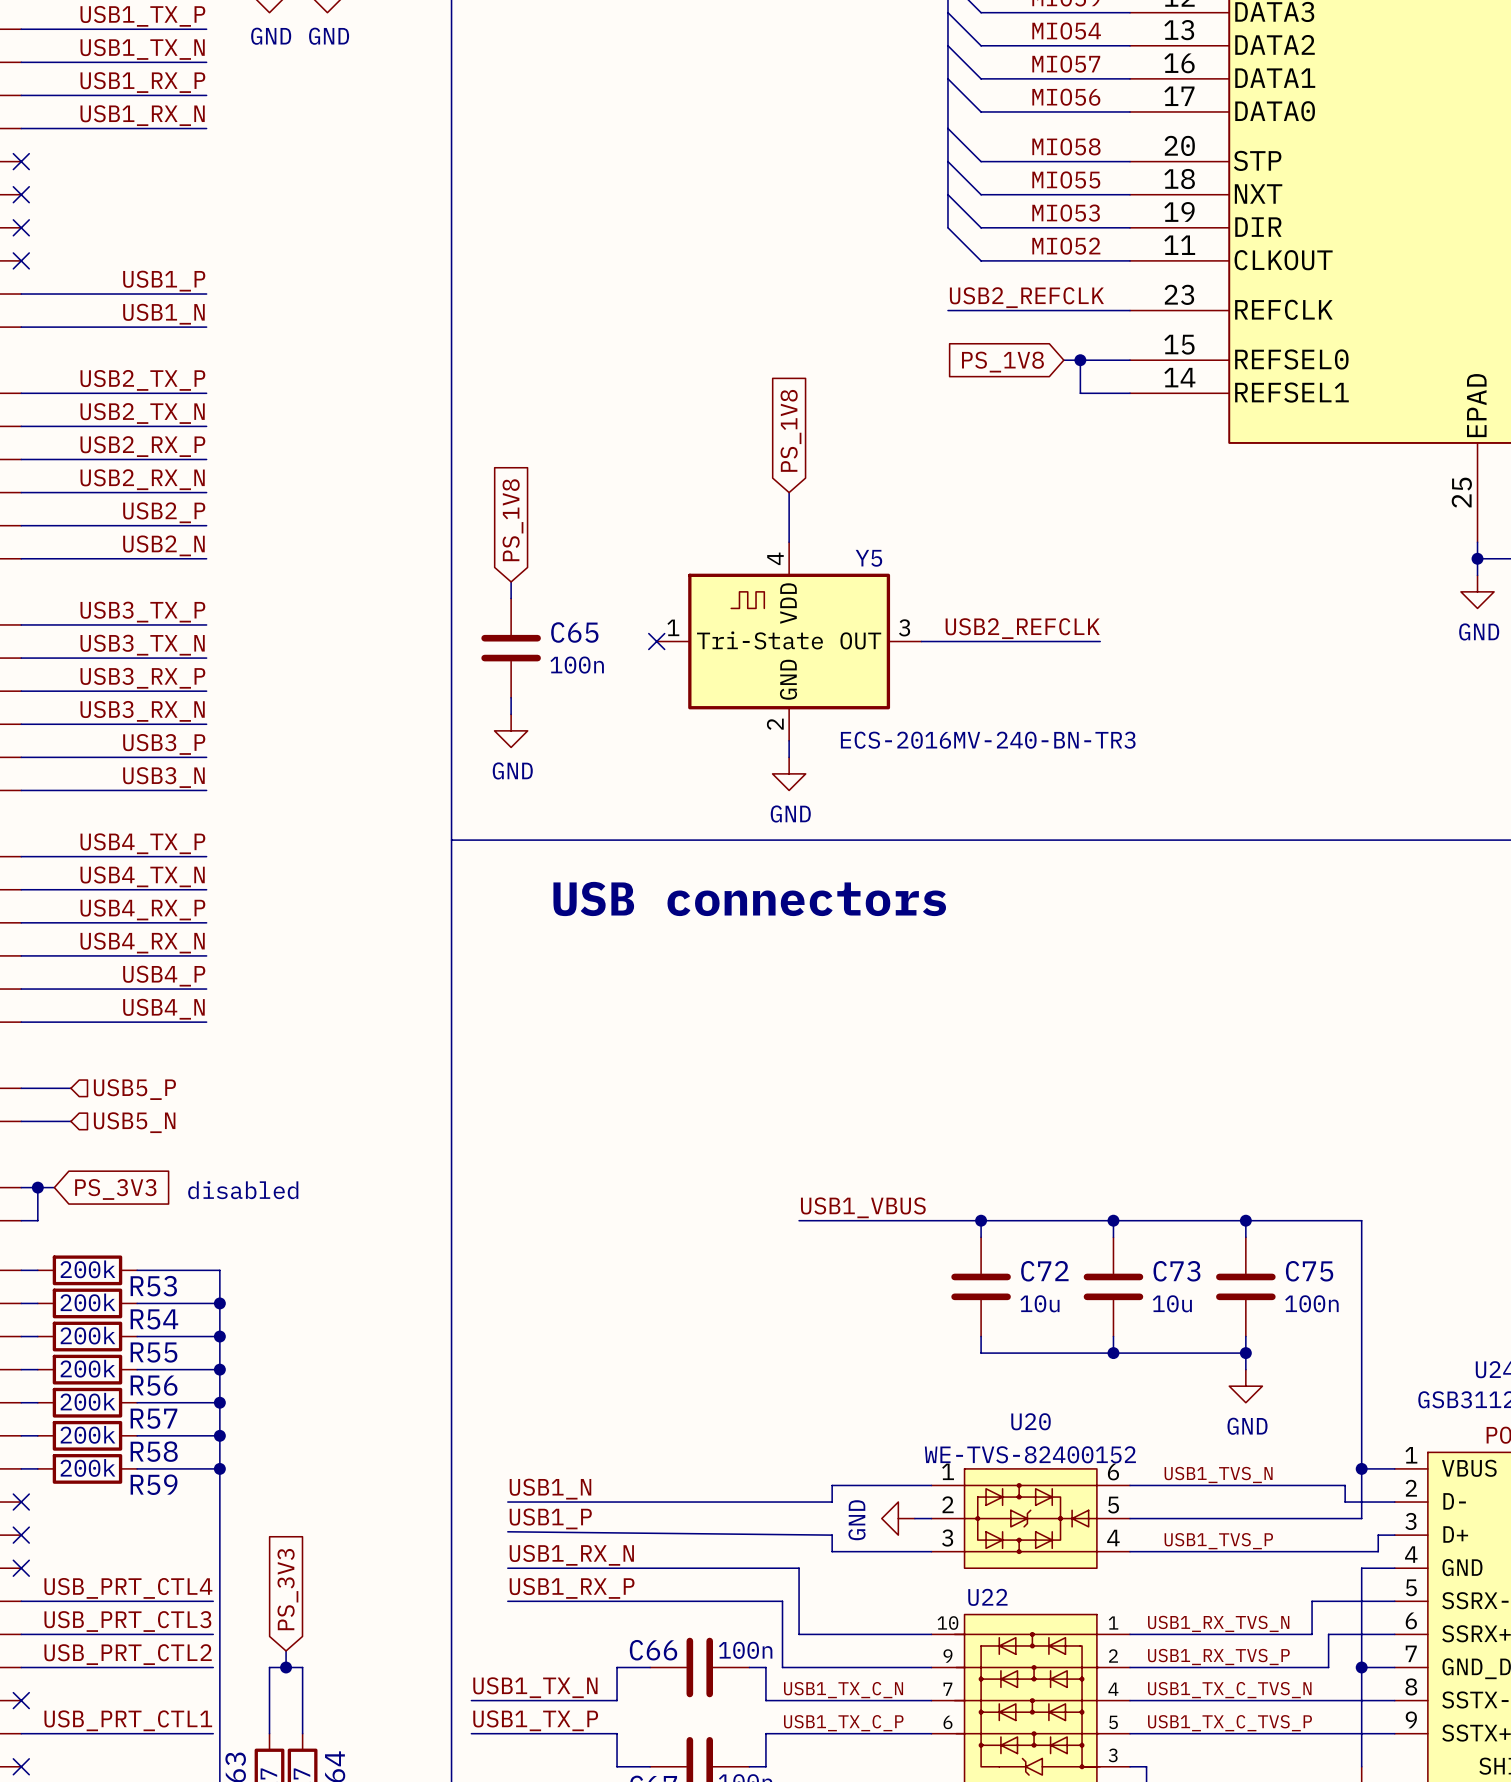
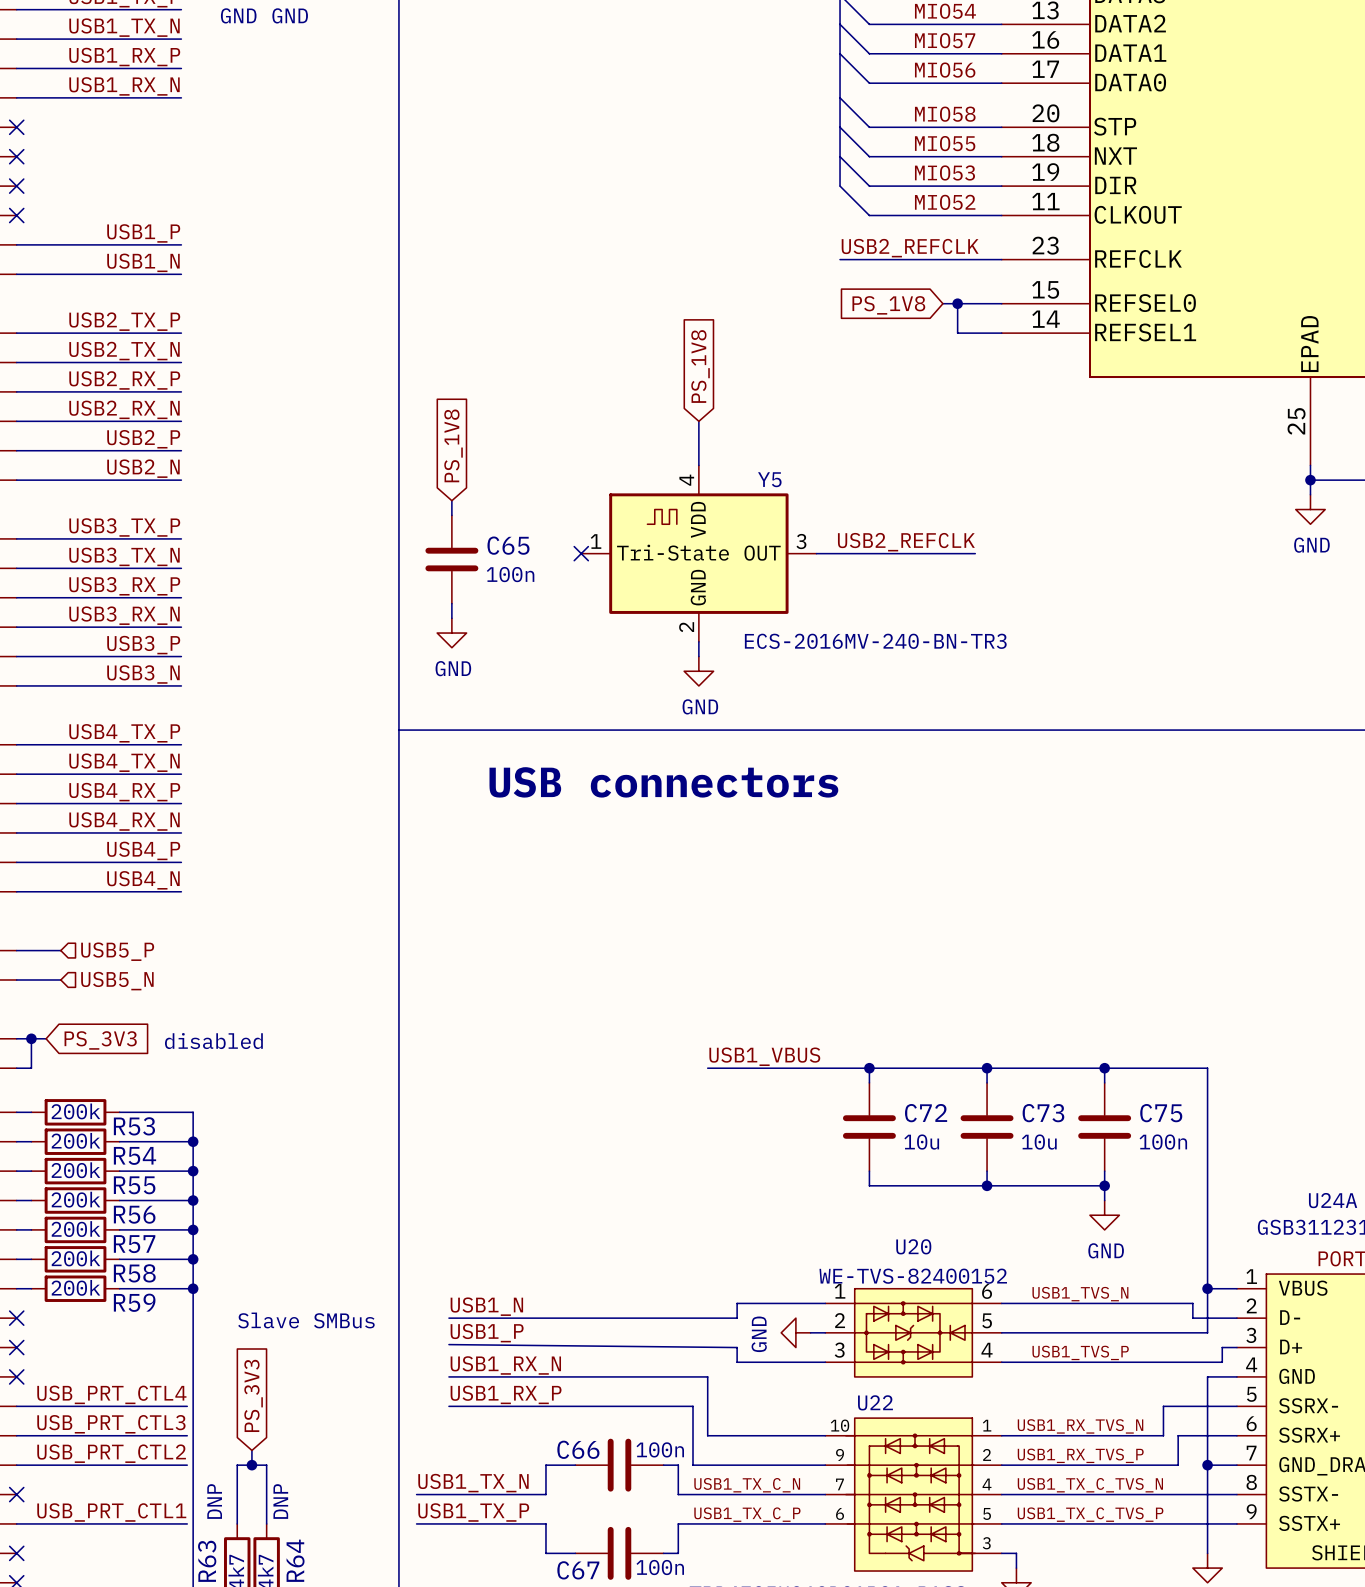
text: none -> Slave SMBus (306, 1320)
R63 text: none -> DNP (214, 1501)
R64 text: none -> DNP (280, 1501)

